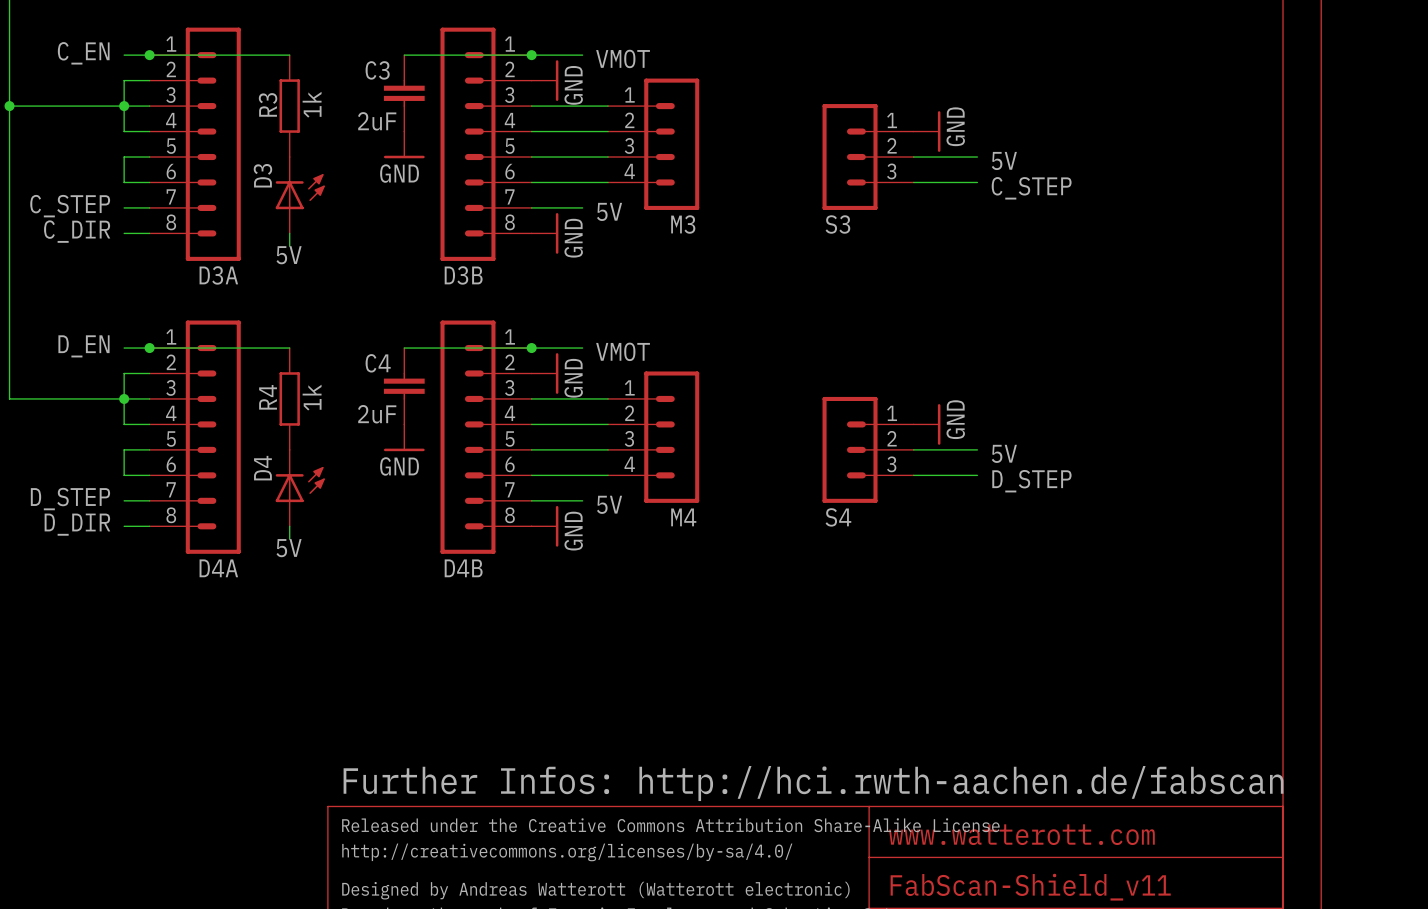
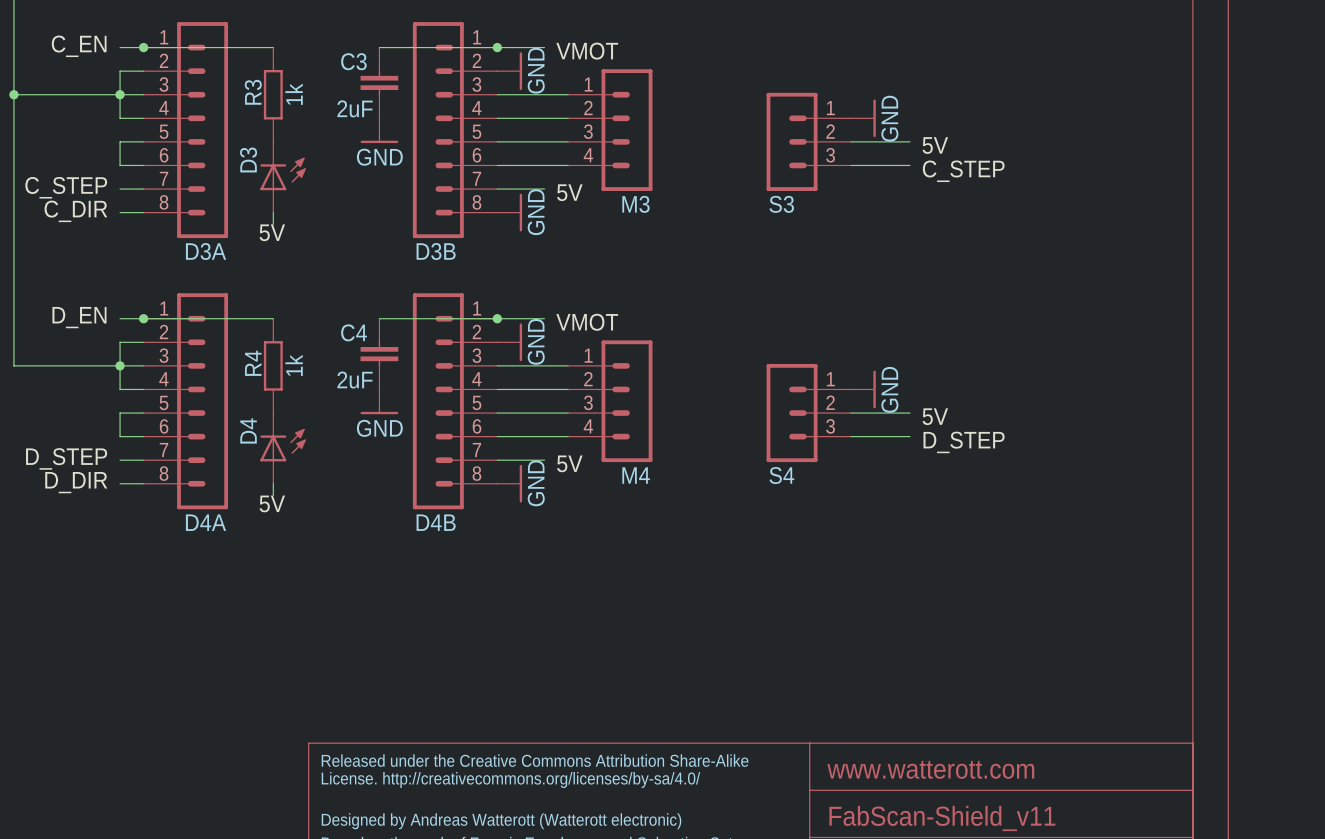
text: Further Infos: http://hci.rwth-aachen.de/fabscan (813, 783) -> none
text: Released under the Creative Commons Attribution Share-Alike License (670, 825) -> License. http://creativecommons.org/licenses/by-sa/4.0/ (510, 779)
text: http://creativecommons.org/licenses/by-sa/4.0/ (567, 852) -> none

